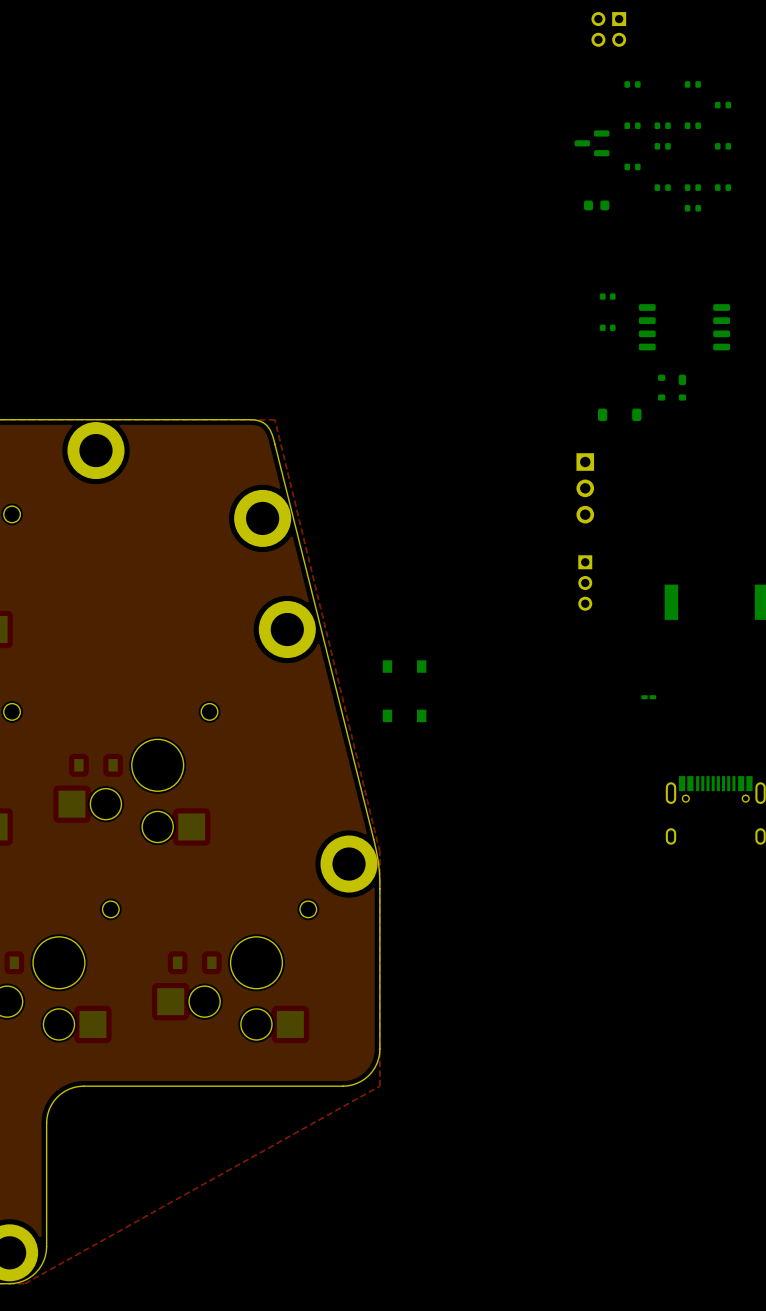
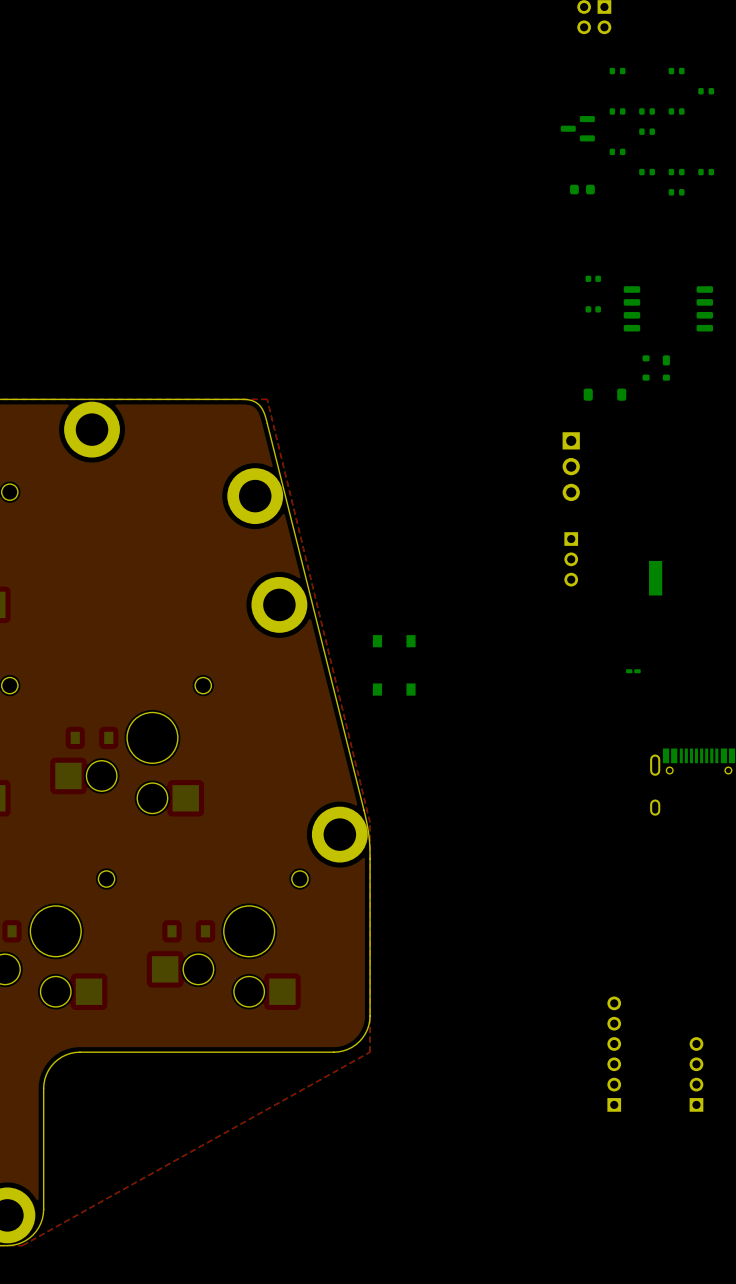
part: (723, 146) -> none
part: none -> (614, 1054)
part: none -> (696, 1074)

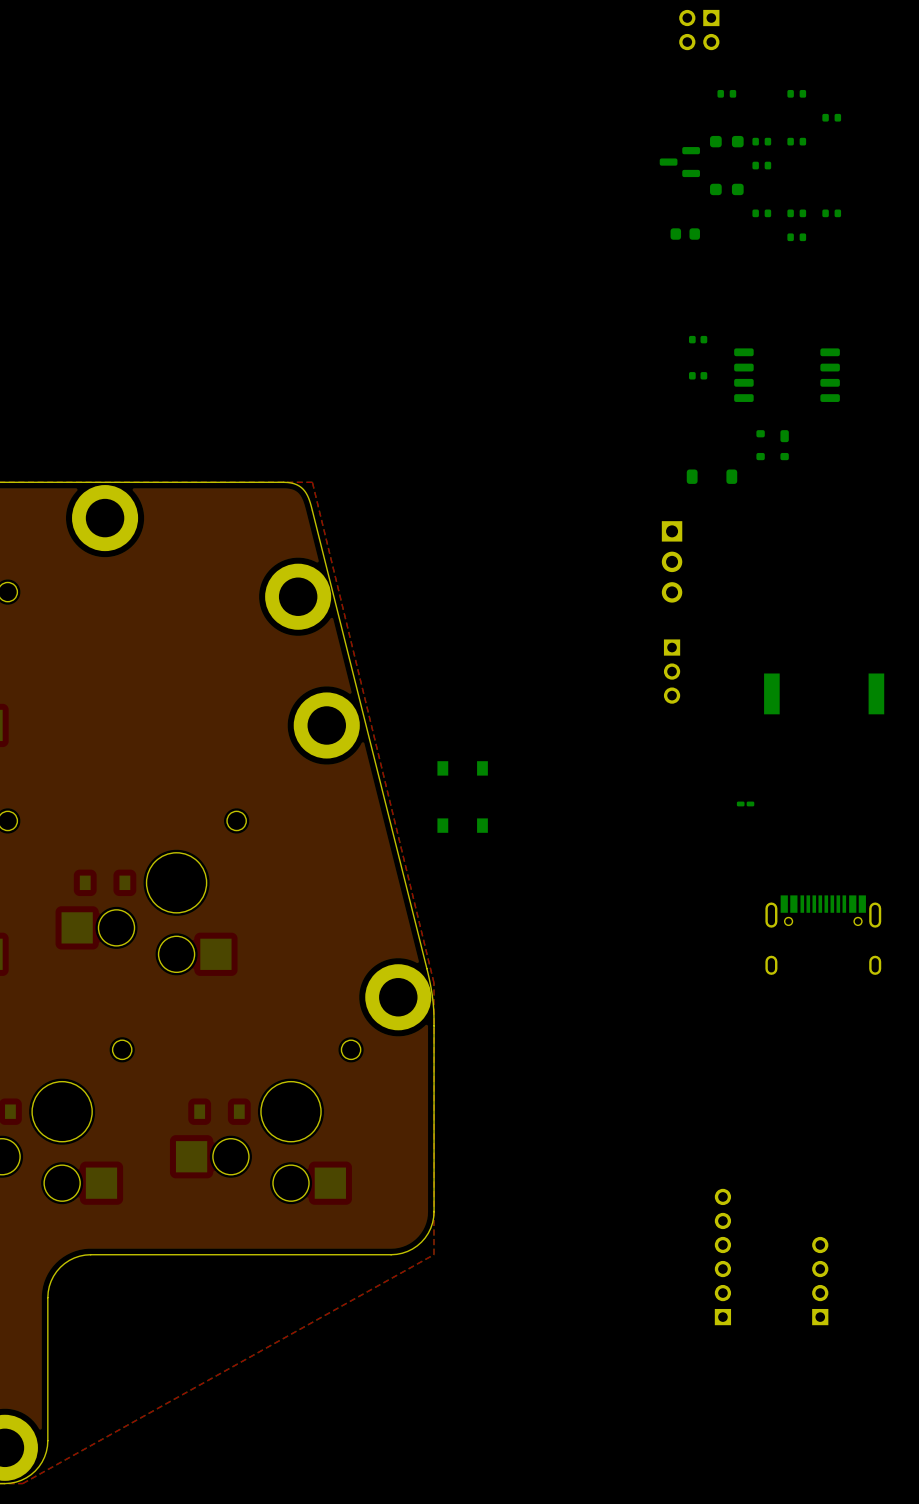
part footprint: [609, 108, 626, 115] -> [710, 135, 744, 148]
part footprint: [609, 148, 626, 156] -> [710, 183, 744, 196]

